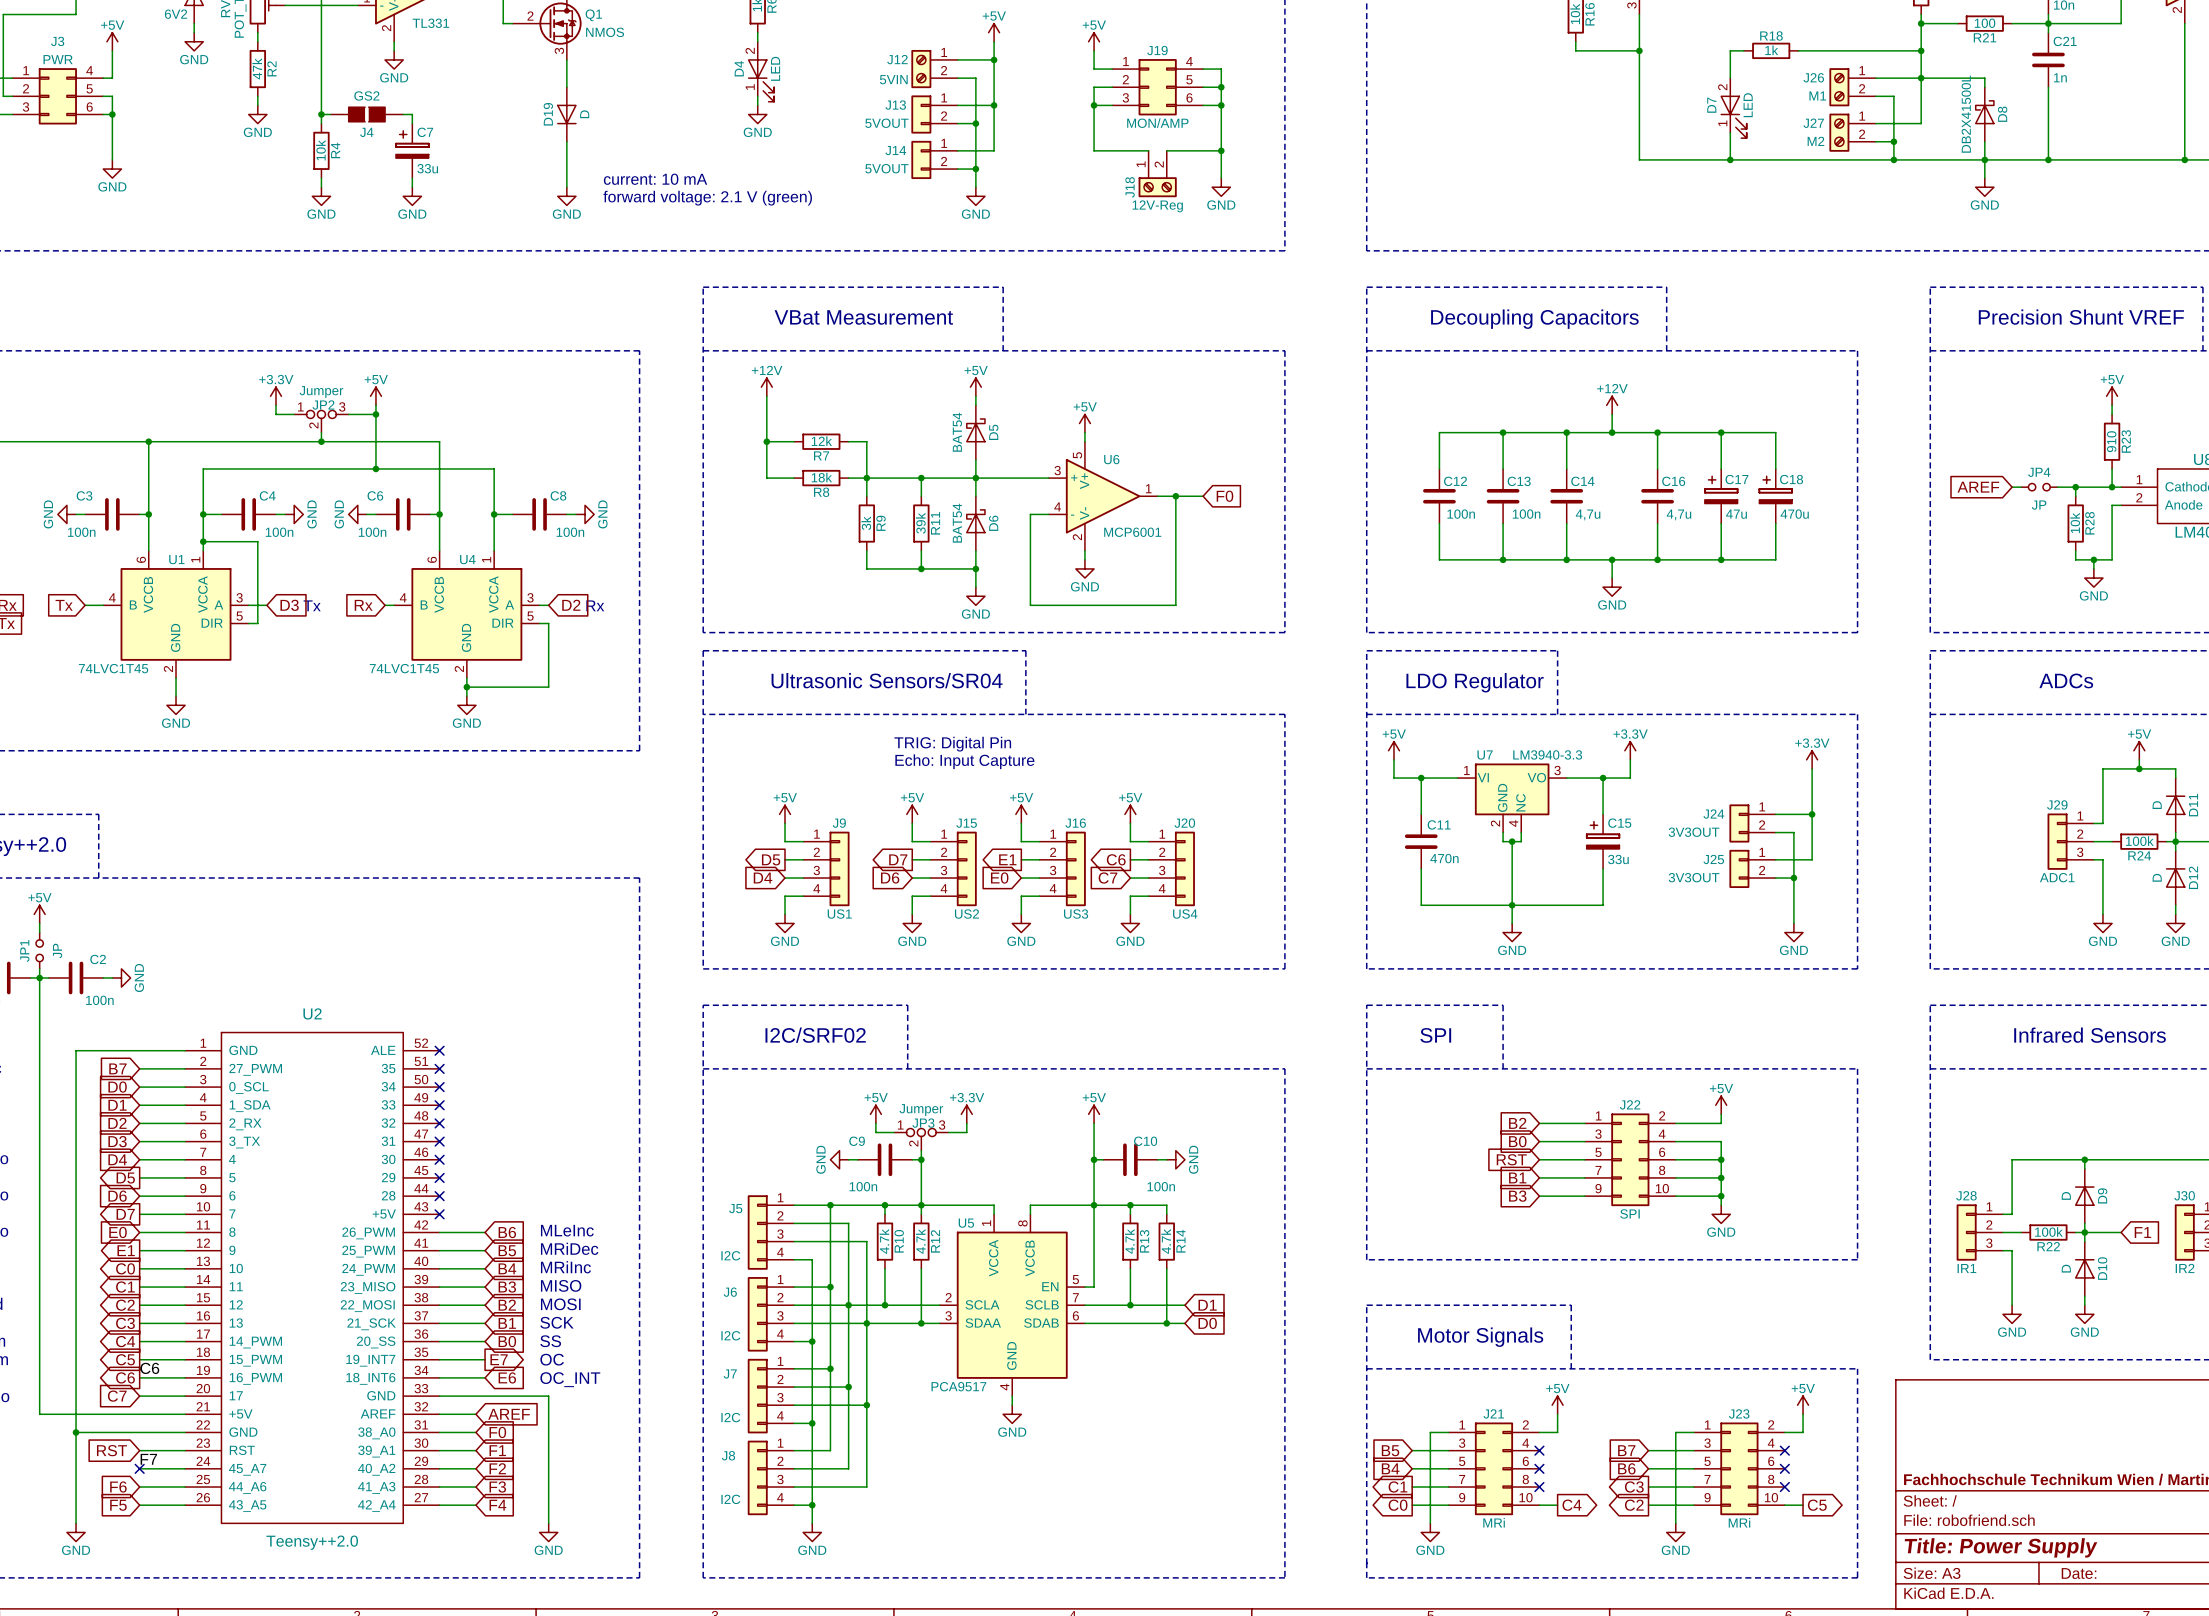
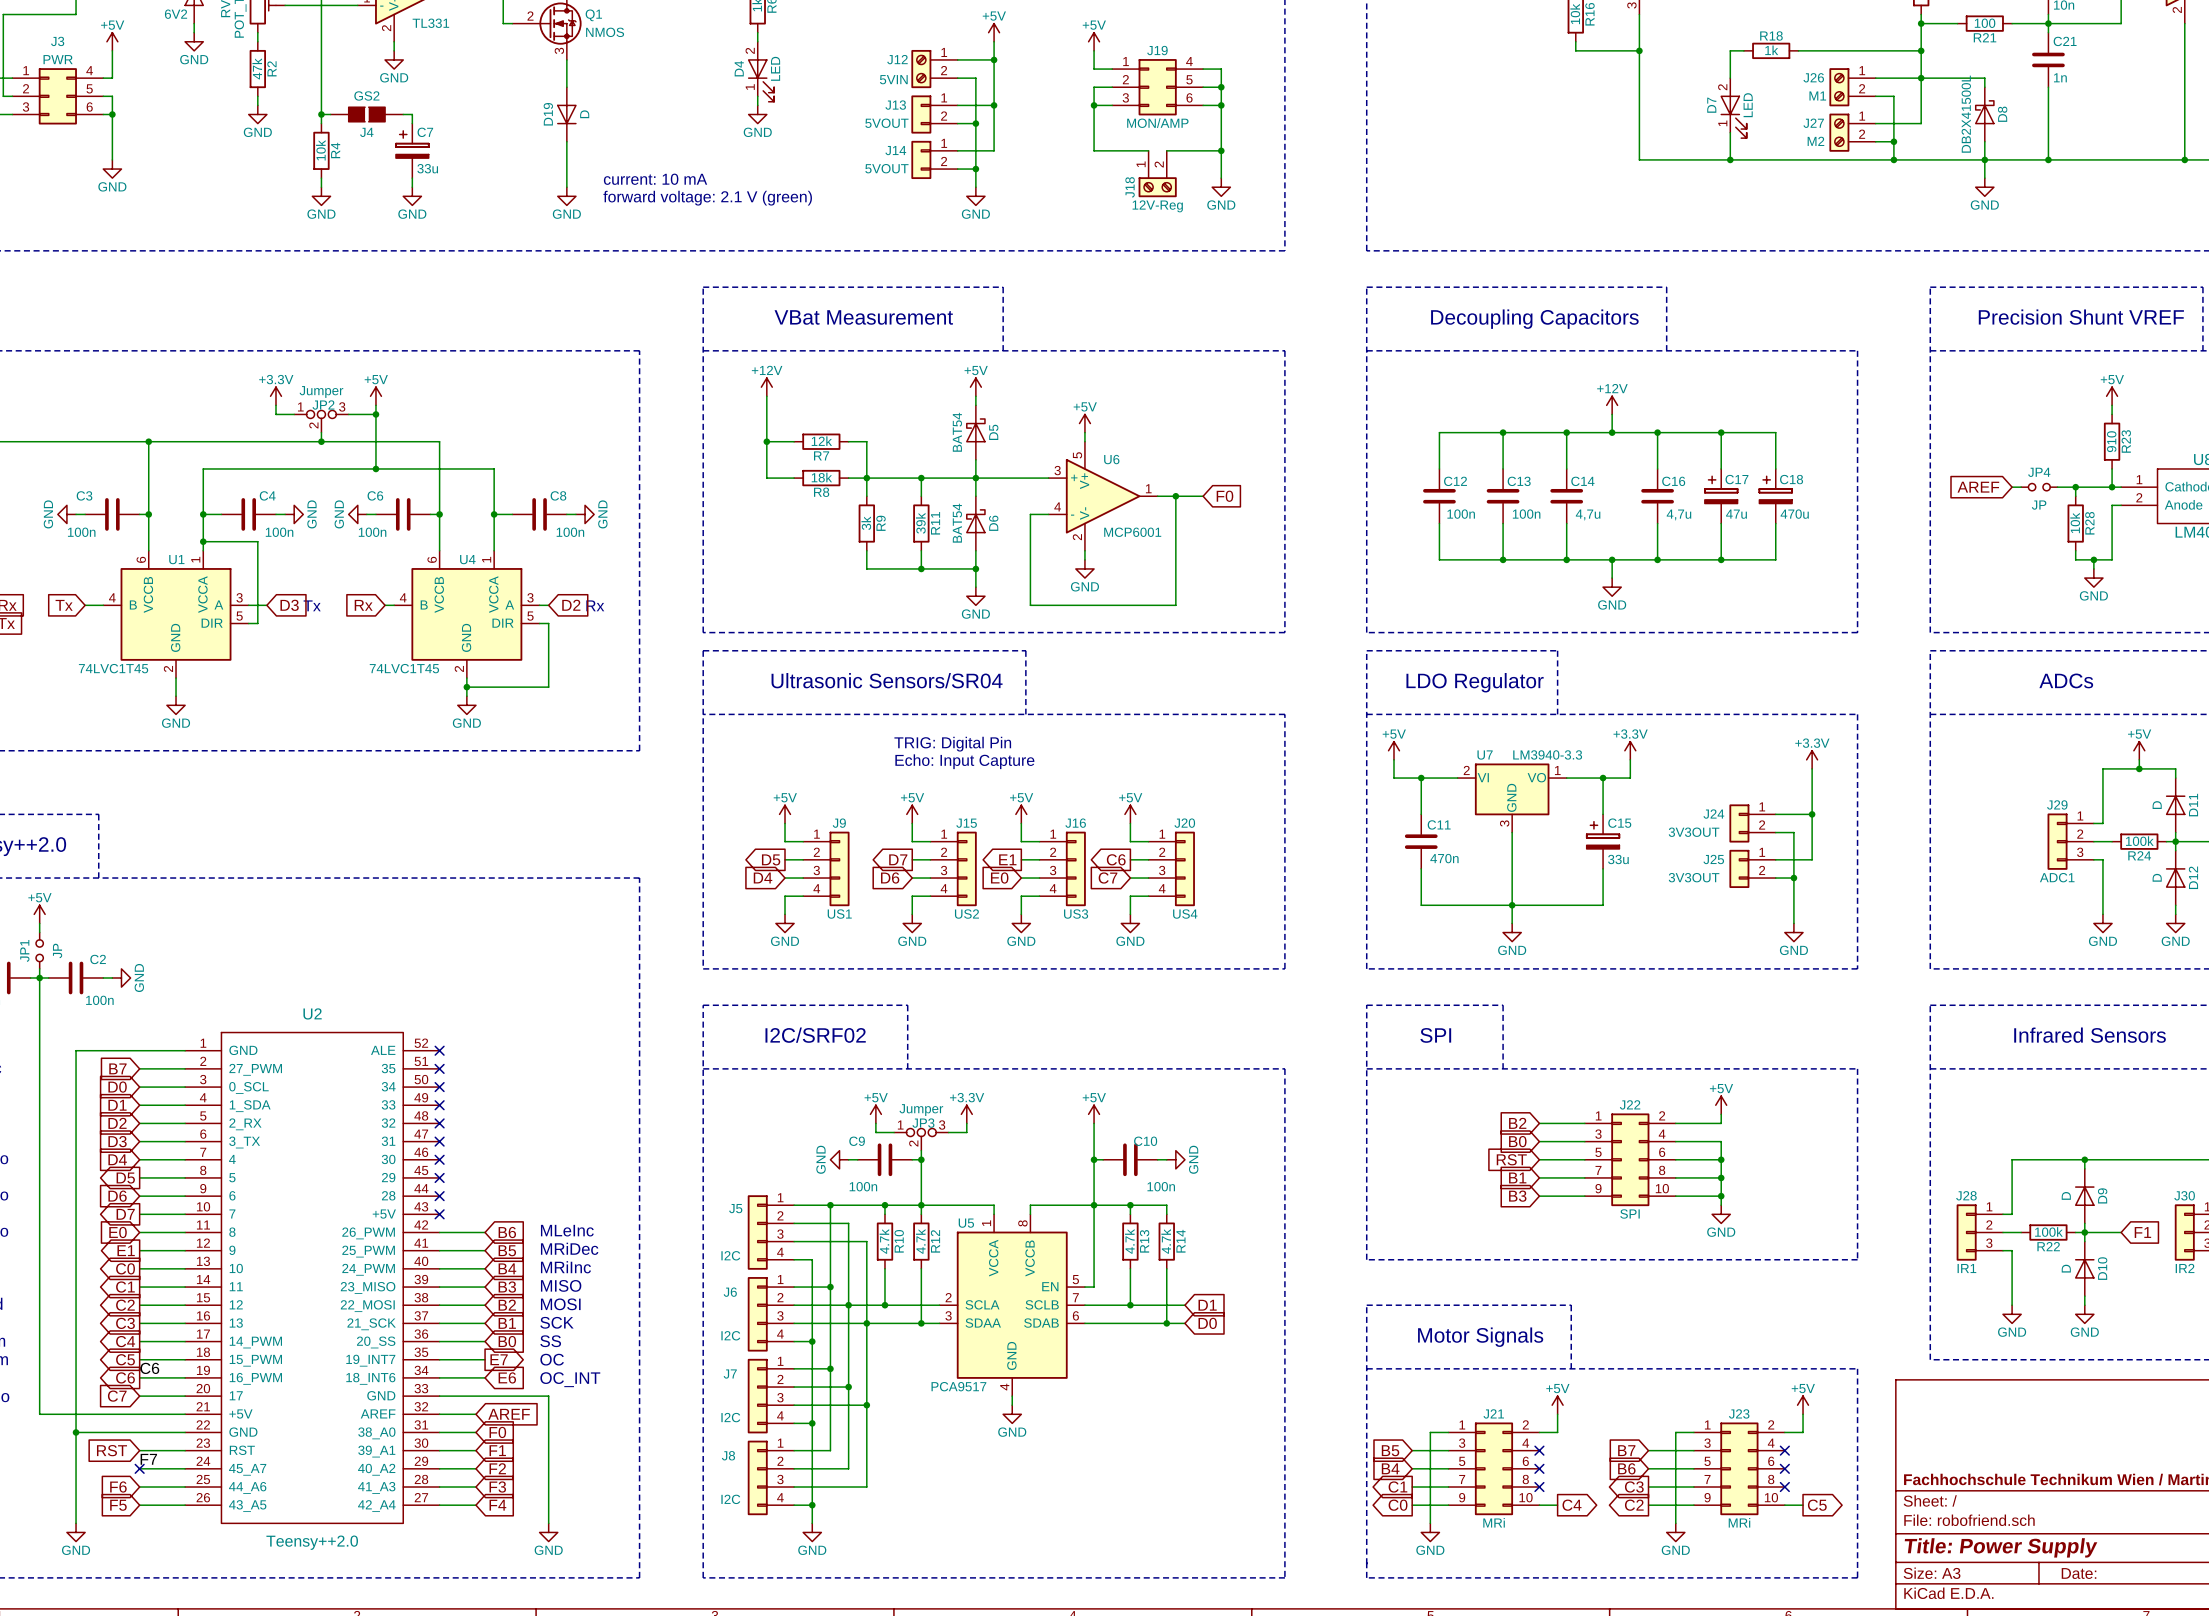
U7 symbol: [1457, 763, 1567, 833] -> [1457, 763, 1567, 833]
wire: (1503, 832) (1503, 841) (1521, 841) (1521, 832) -> none
wire: none -> (1512, 832) (1512, 841)
junction: (1512, 841) -> none

